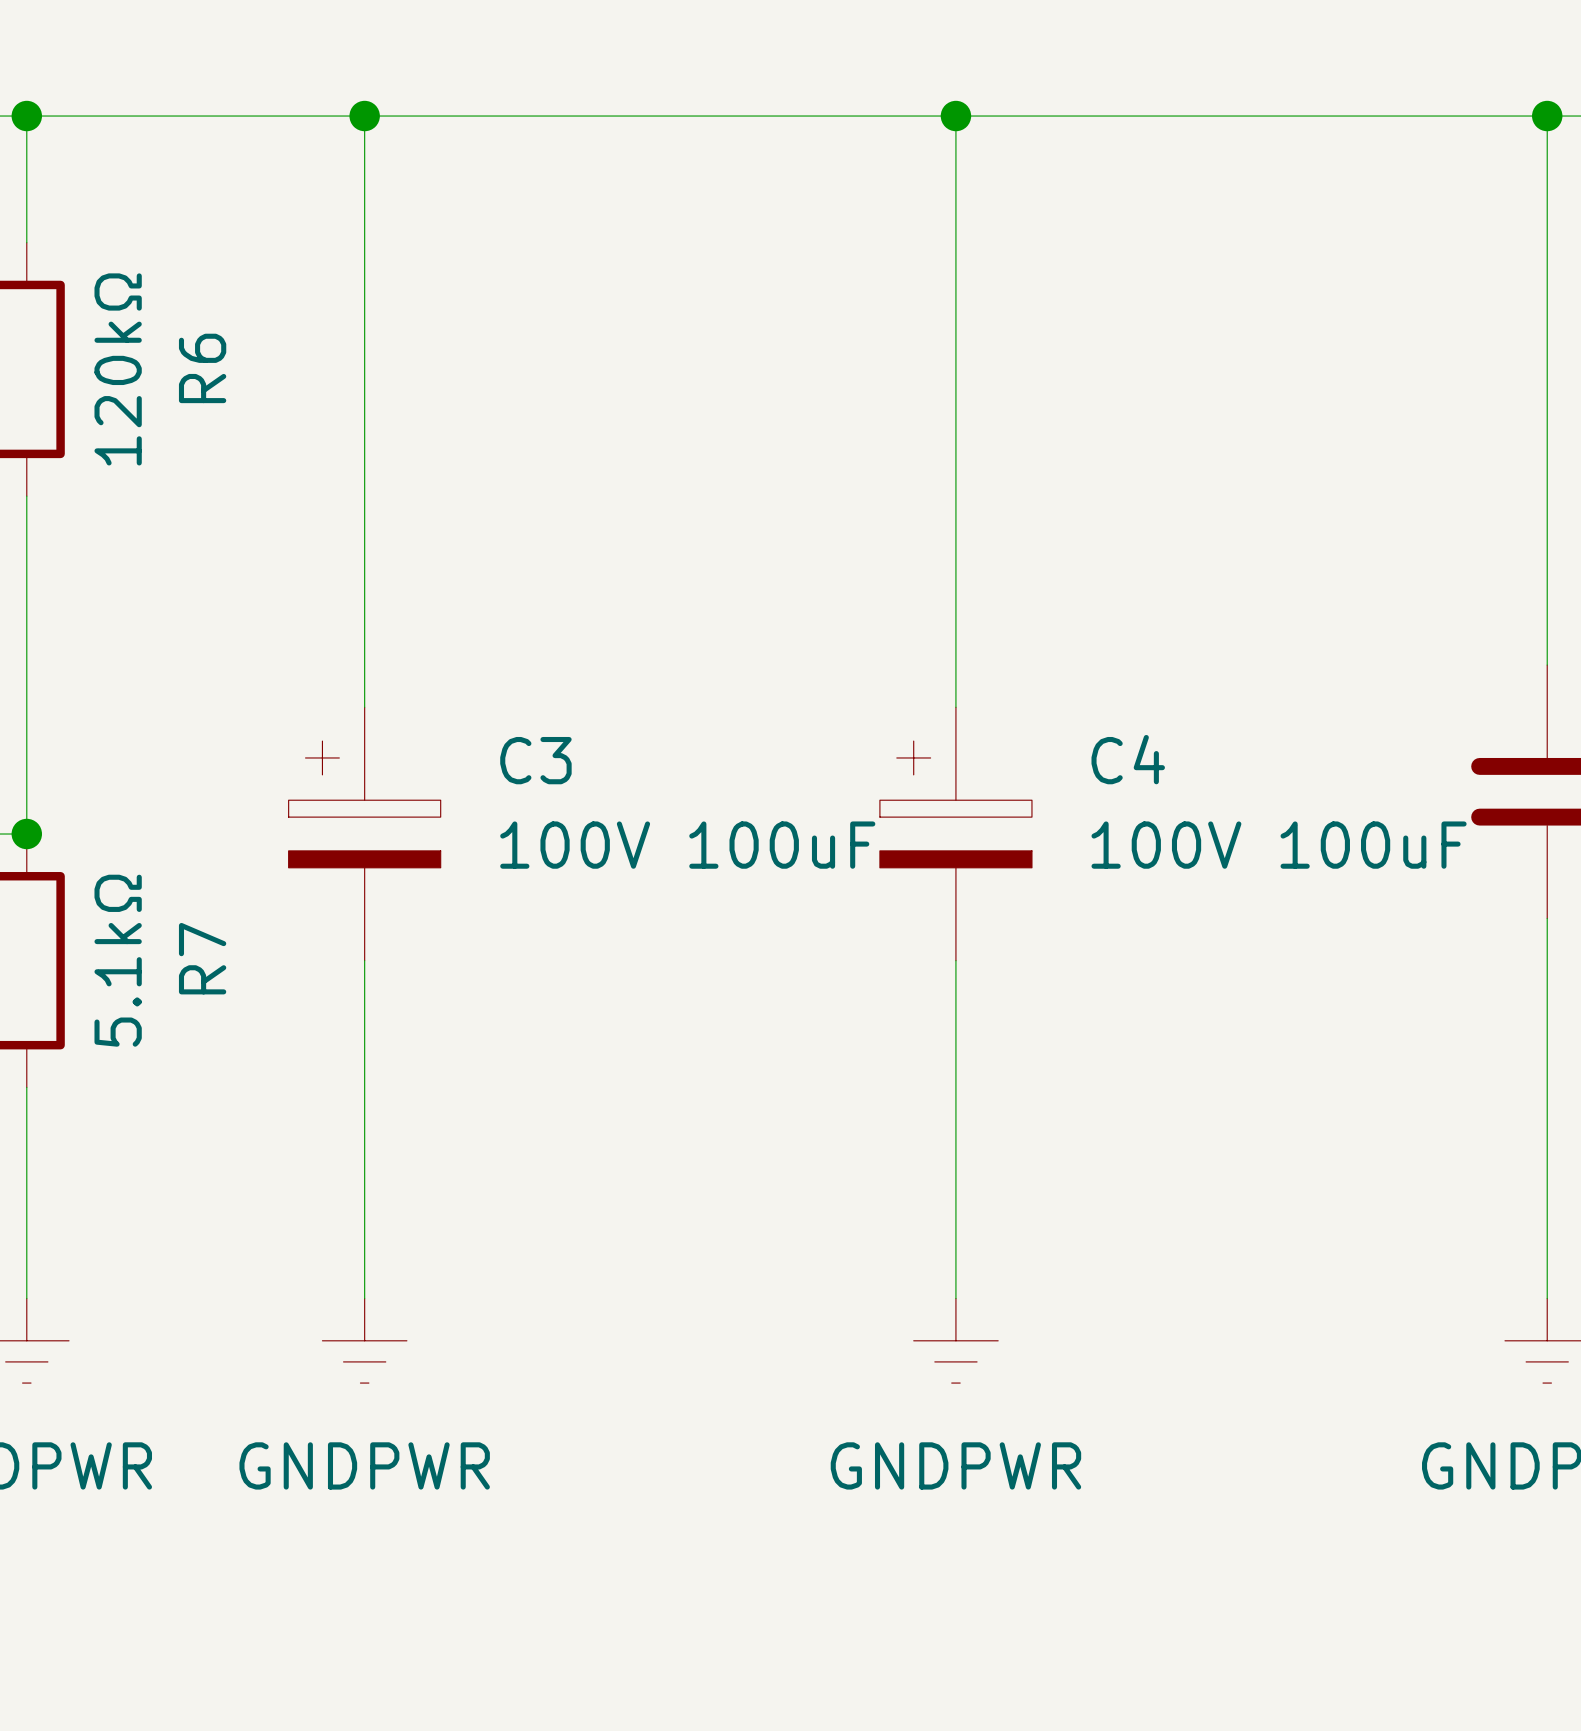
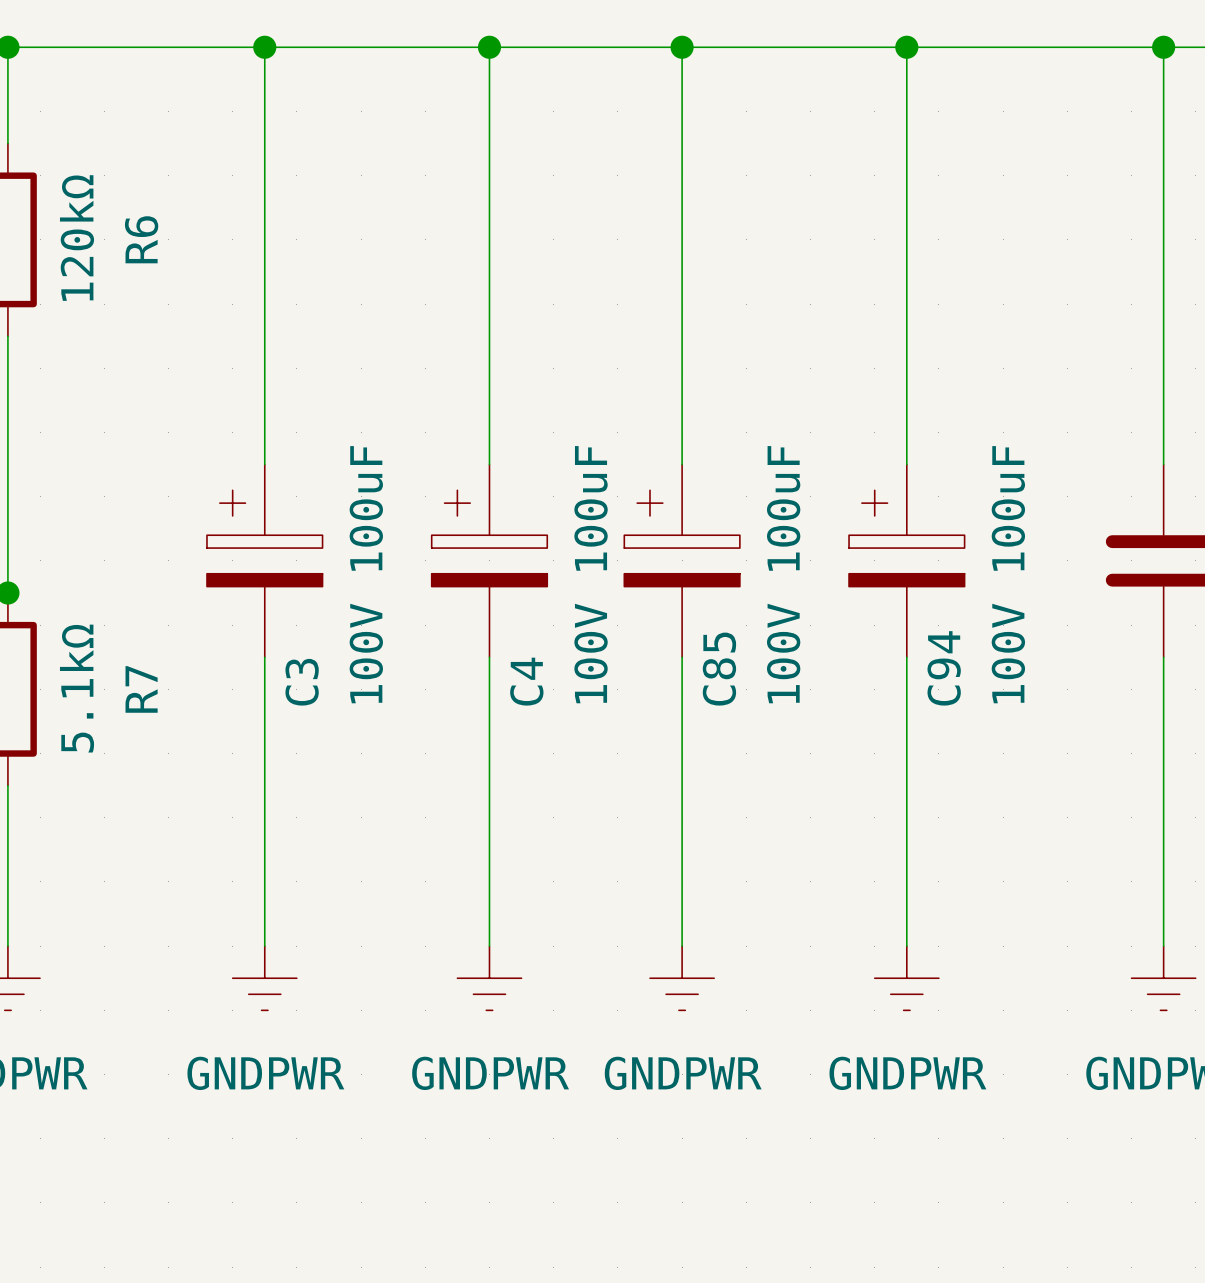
wire: none -> (489, 47) (489, 464)
junction: none -> (489, 47)
wire: none -> (682, 47) (682, 464)
wire: (955, 116) (955, 707) -> none
junction position: (955, 116) -> (682, 47)
wire: none -> (906, 47) (906, 464)
junction: none -> (906, 47)
C4 name rotation: 0° (1128, 759) -> 90° counterclockwise (526, 681)
C4 name position: C4 (1128, 759) -> C4 (526, 681)
C3 name rotation: 0° (535, 760) -> 90° counterclockwise (302, 682)
C3 name position: C3 (535, 760) -> C3 (302, 682)
C85: none -> 100V 100uF (682, 560)
C94: none -> 100V 100uF (906, 560)
C3 position: (364, 834) -> (264, 560)
C4 position: (955, 834) -> (489, 560)
C3 value rotation: 0° (687, 845) -> 90° counterclockwise (366, 574)
C4 value rotation: 0° (1279, 845) -> 90° counterclockwise (591, 574)
wire: none -> (489, 657) (489, 946)
wire: none -> (682, 657) (682, 946)
wire: none -> (906, 657) (906, 946)
wire: (955, 960) (955, 1298) -> none
power symbol: none -> GNDPWR (489, 978)
power symbol position: GNDPWR (955, 1340) -> GNDPWR (682, 978)
power symbol: none -> GNDPWR (906, 978)

